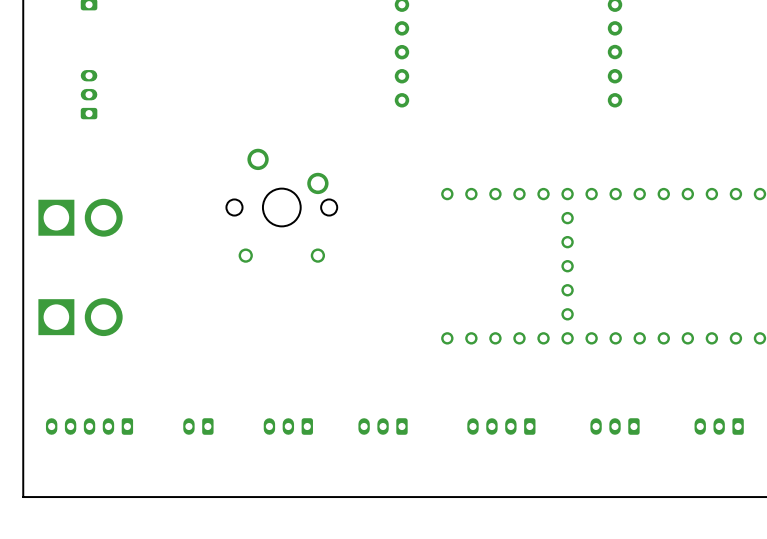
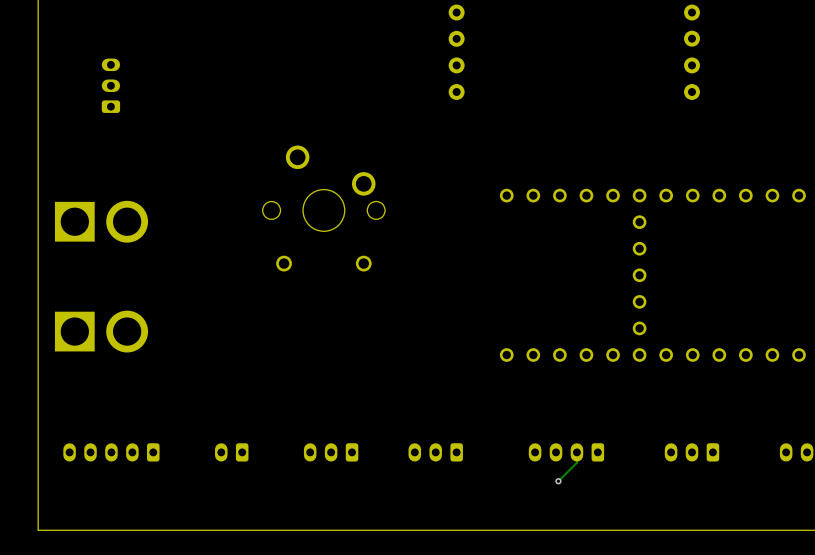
track: none -> (576, 452) (576, 462) (558, 481)
via: none -> (558, 481)

